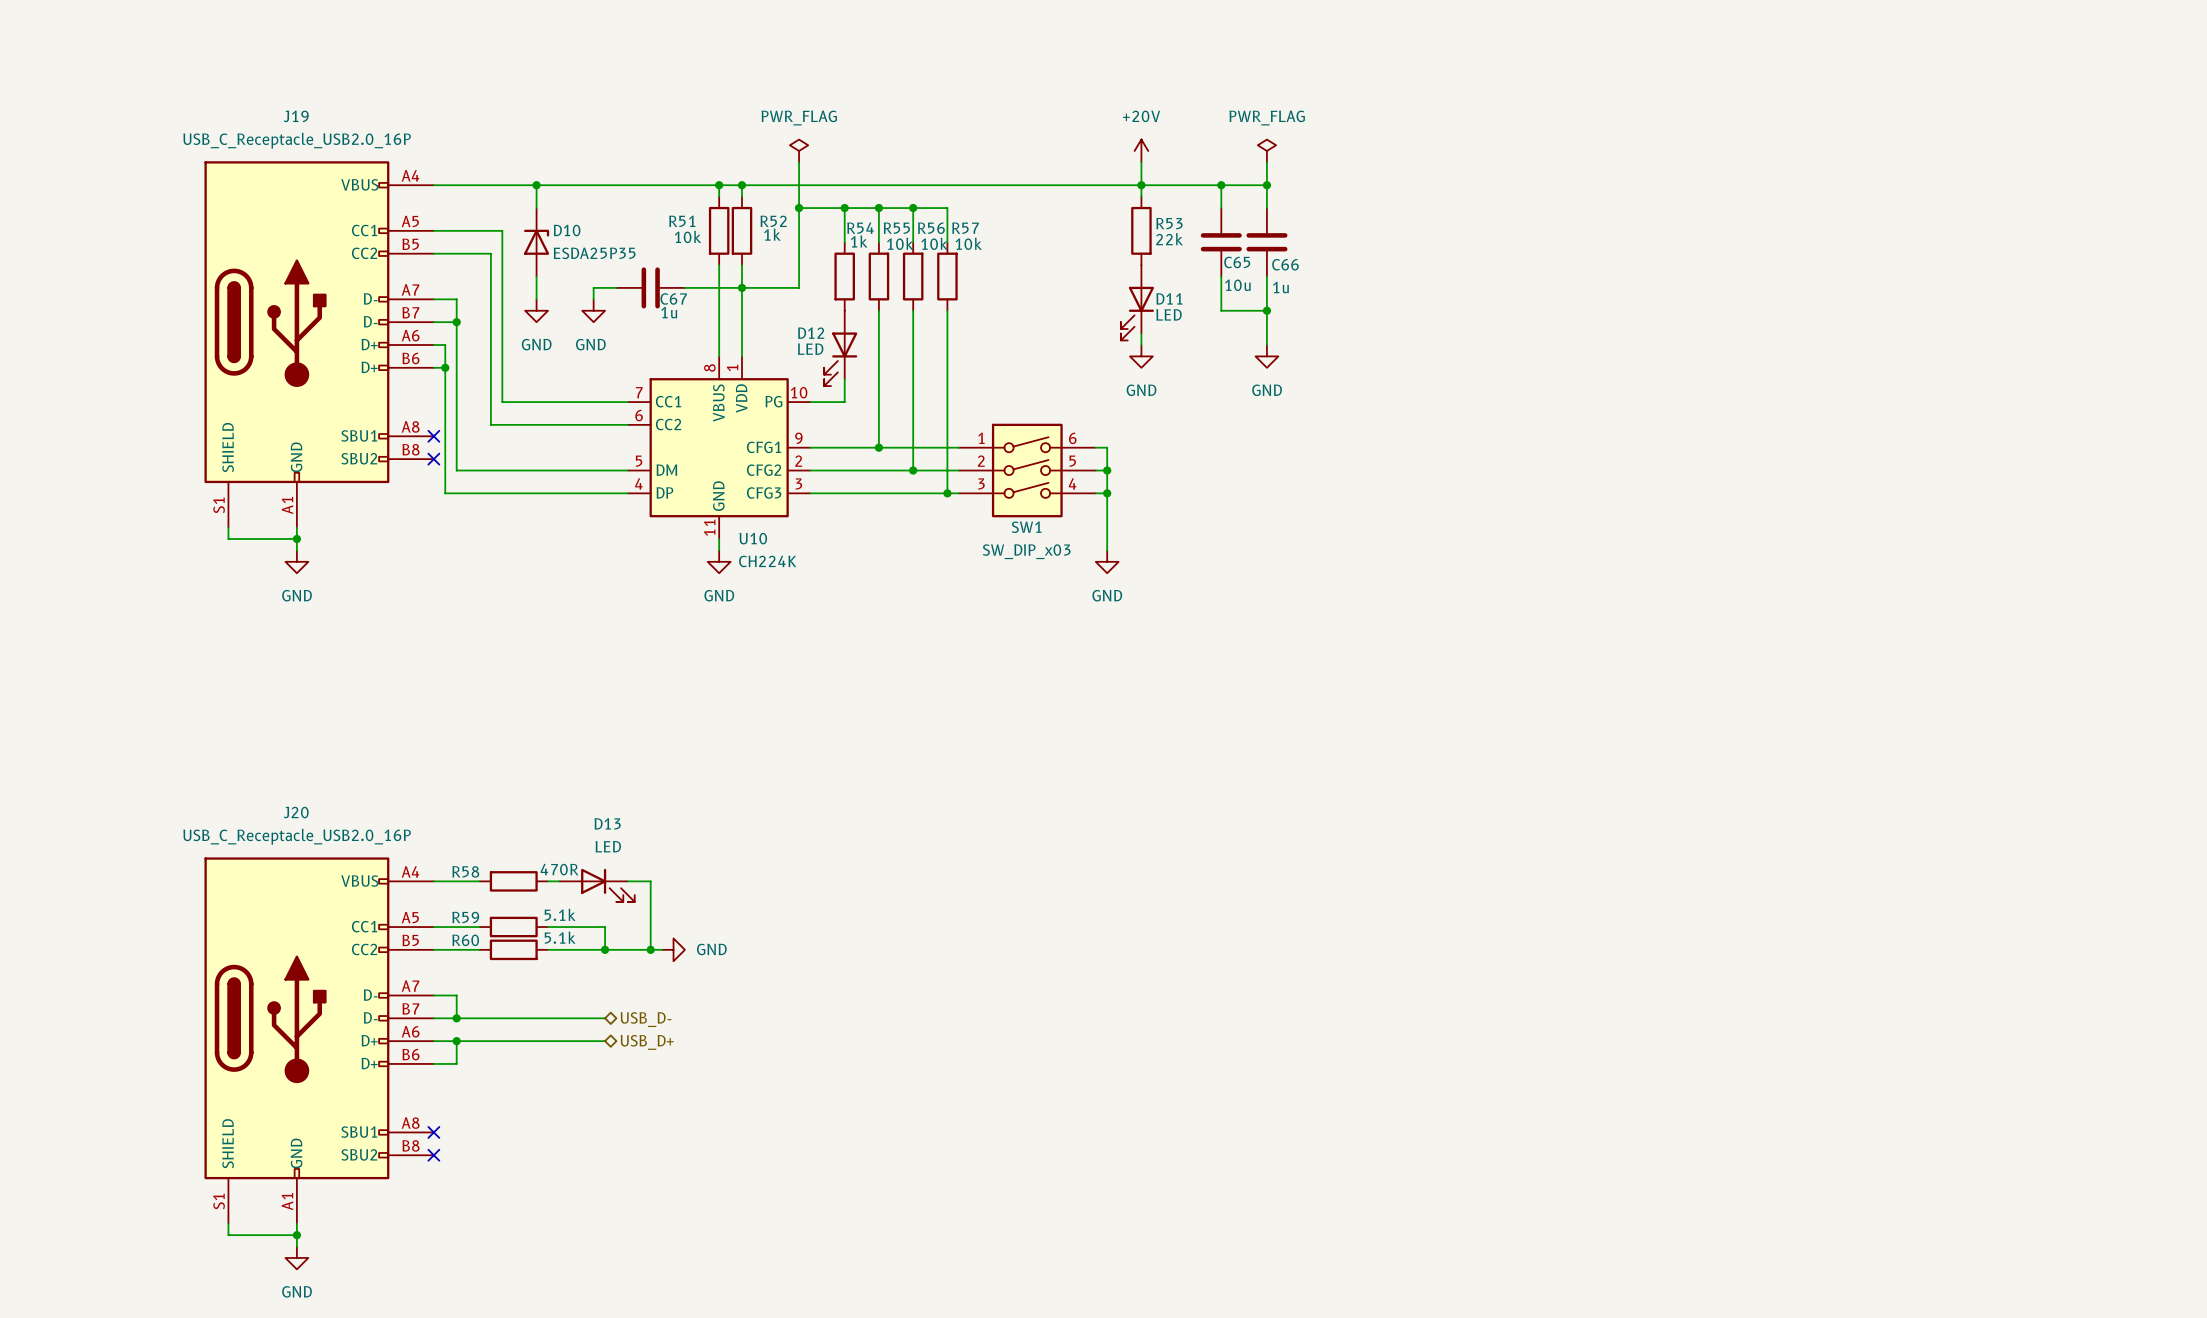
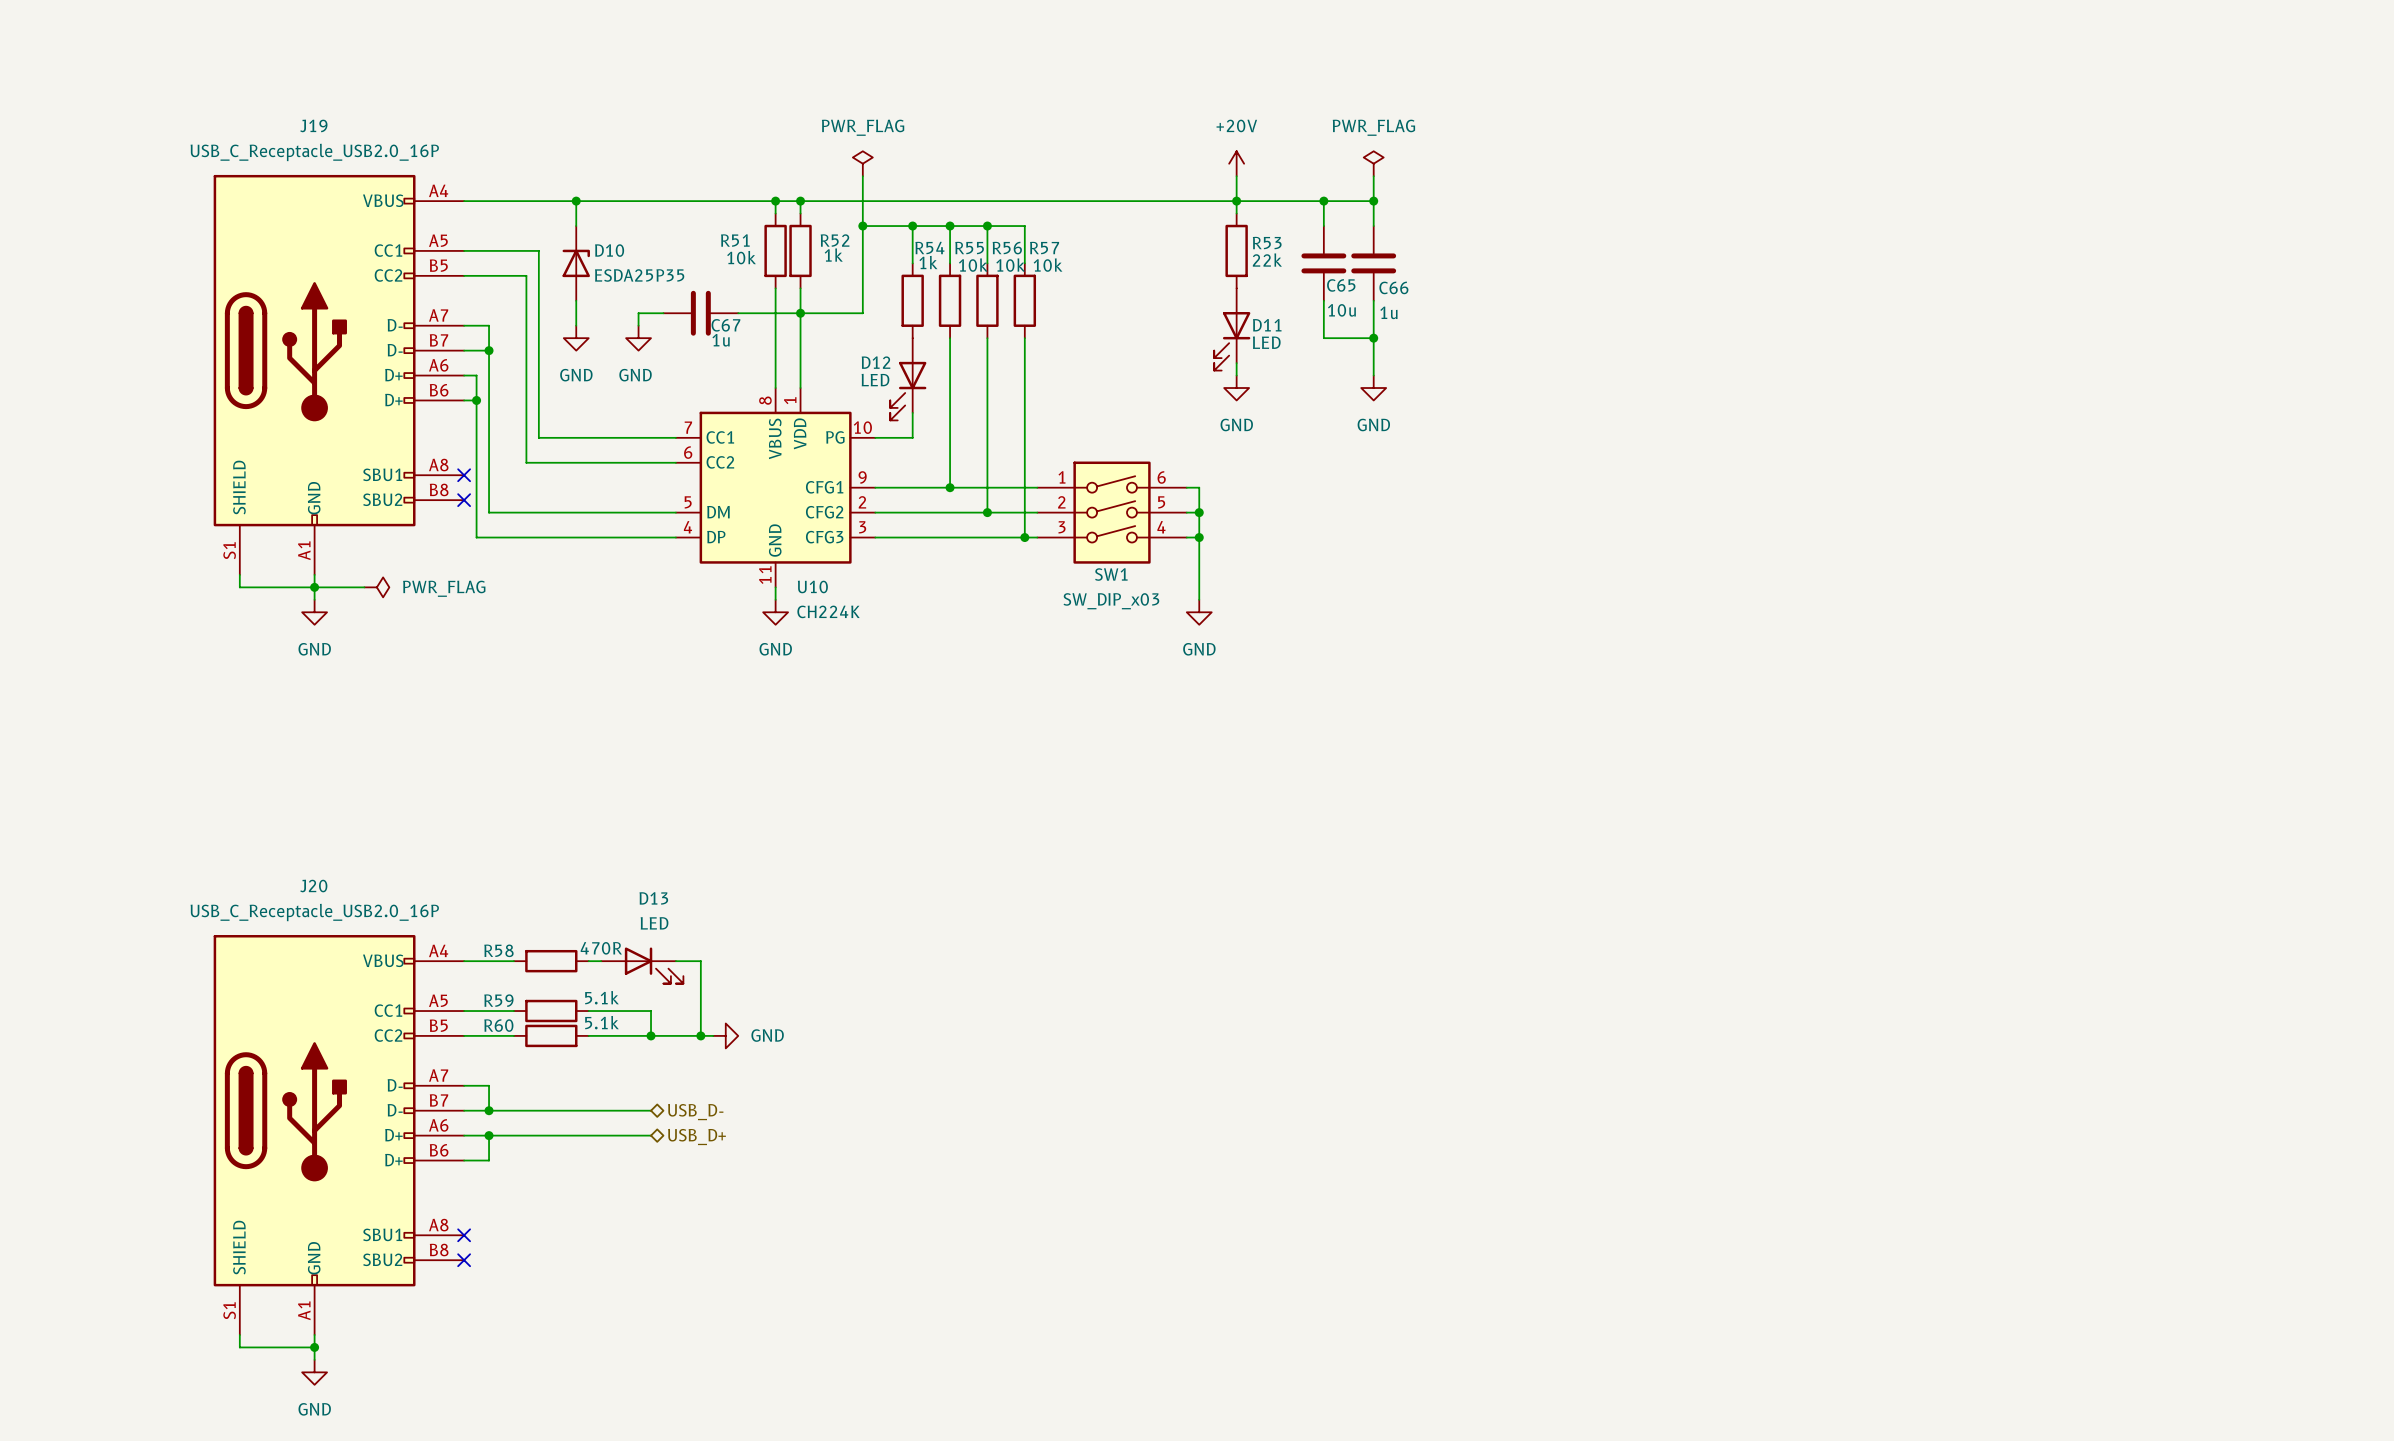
wire: none -> (314, 587) (364, 587)
power symbol: none -> PWR_FLAG (376, 587)

